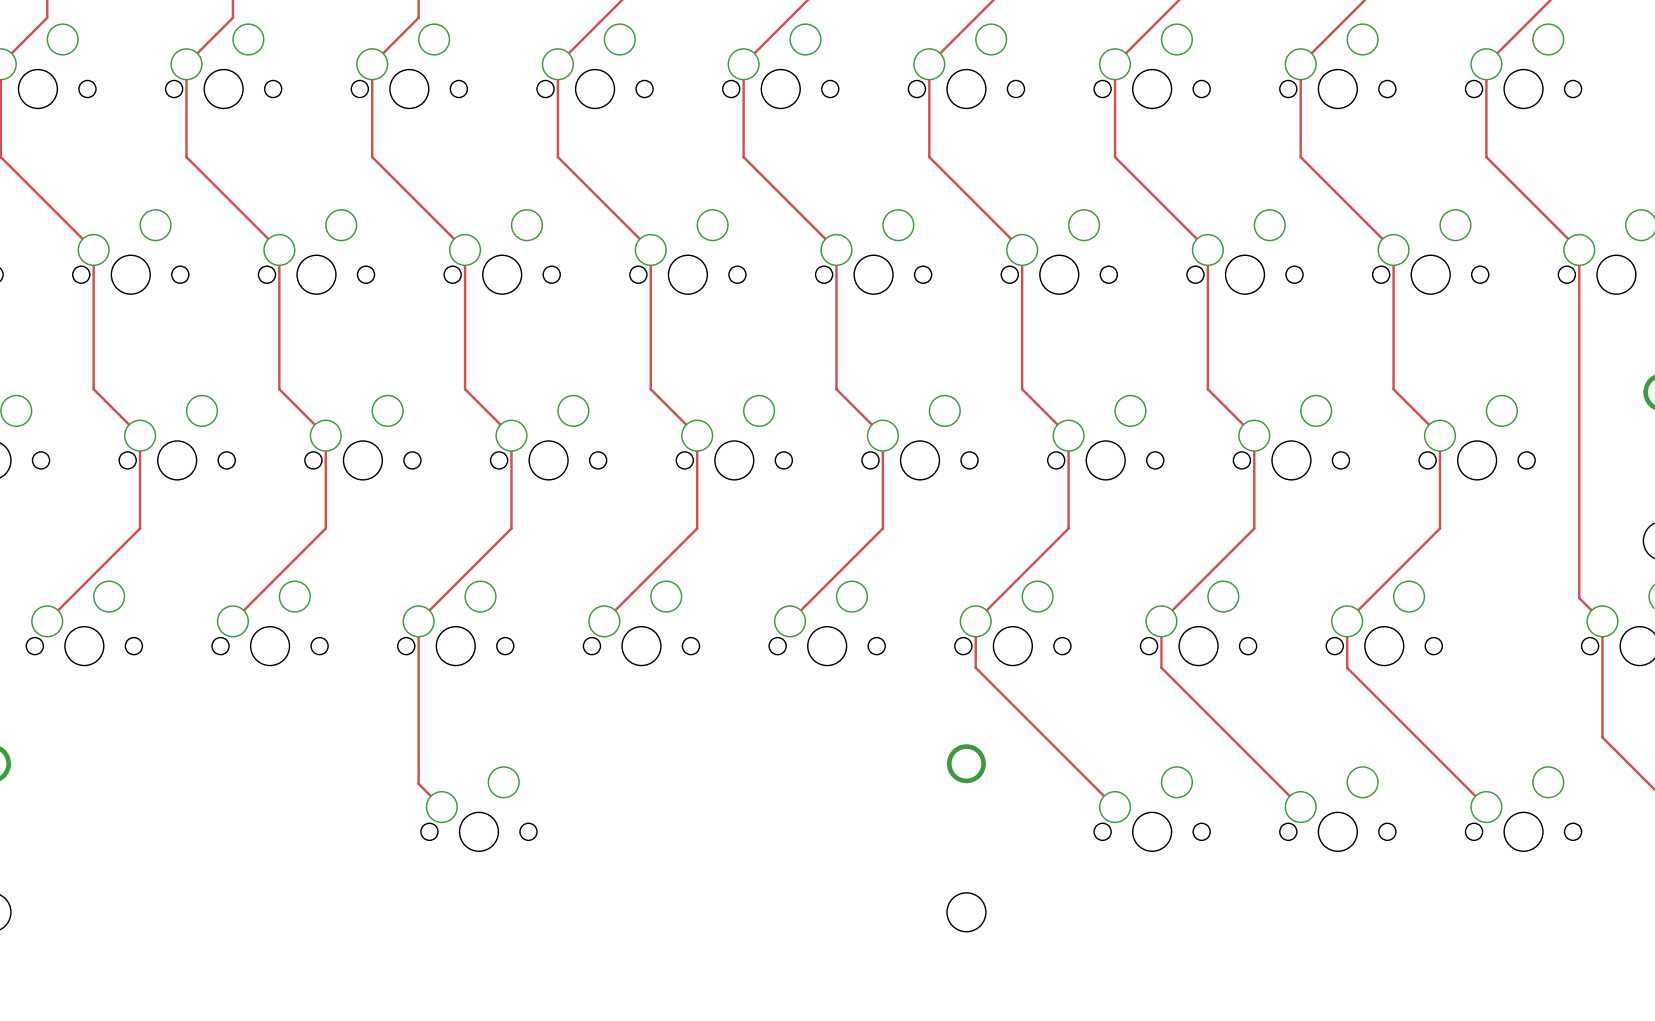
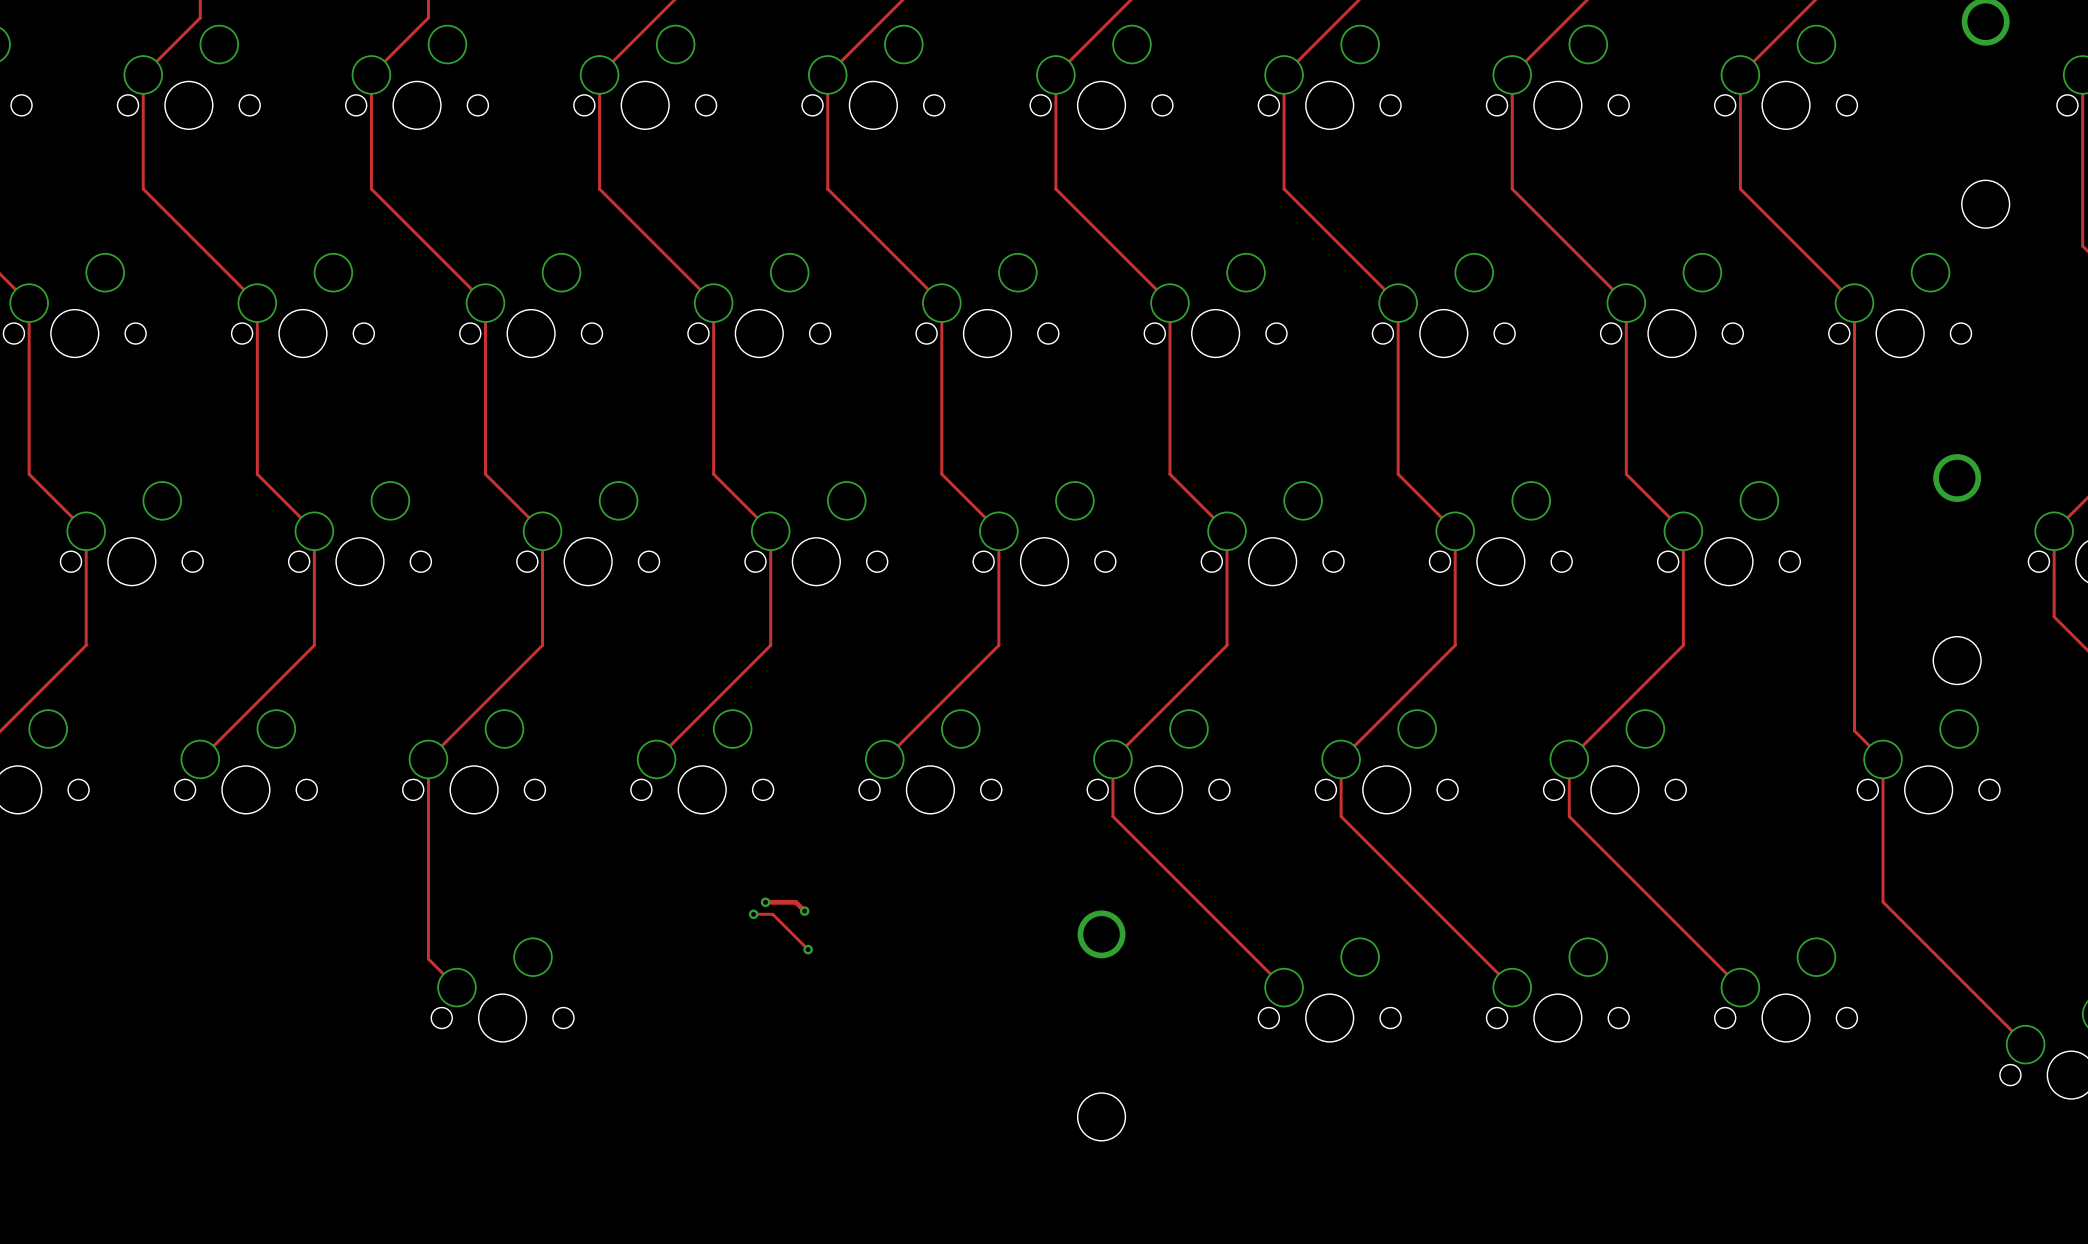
track: none -> (765, 902) (795, 902) (804, 911)
via: none -> (765, 902)
via: none -> (804, 911)
track: none -> (753, 914) (772, 914) (808, 949)
via: none -> (753, 914)
via: none -> (808, 949)

